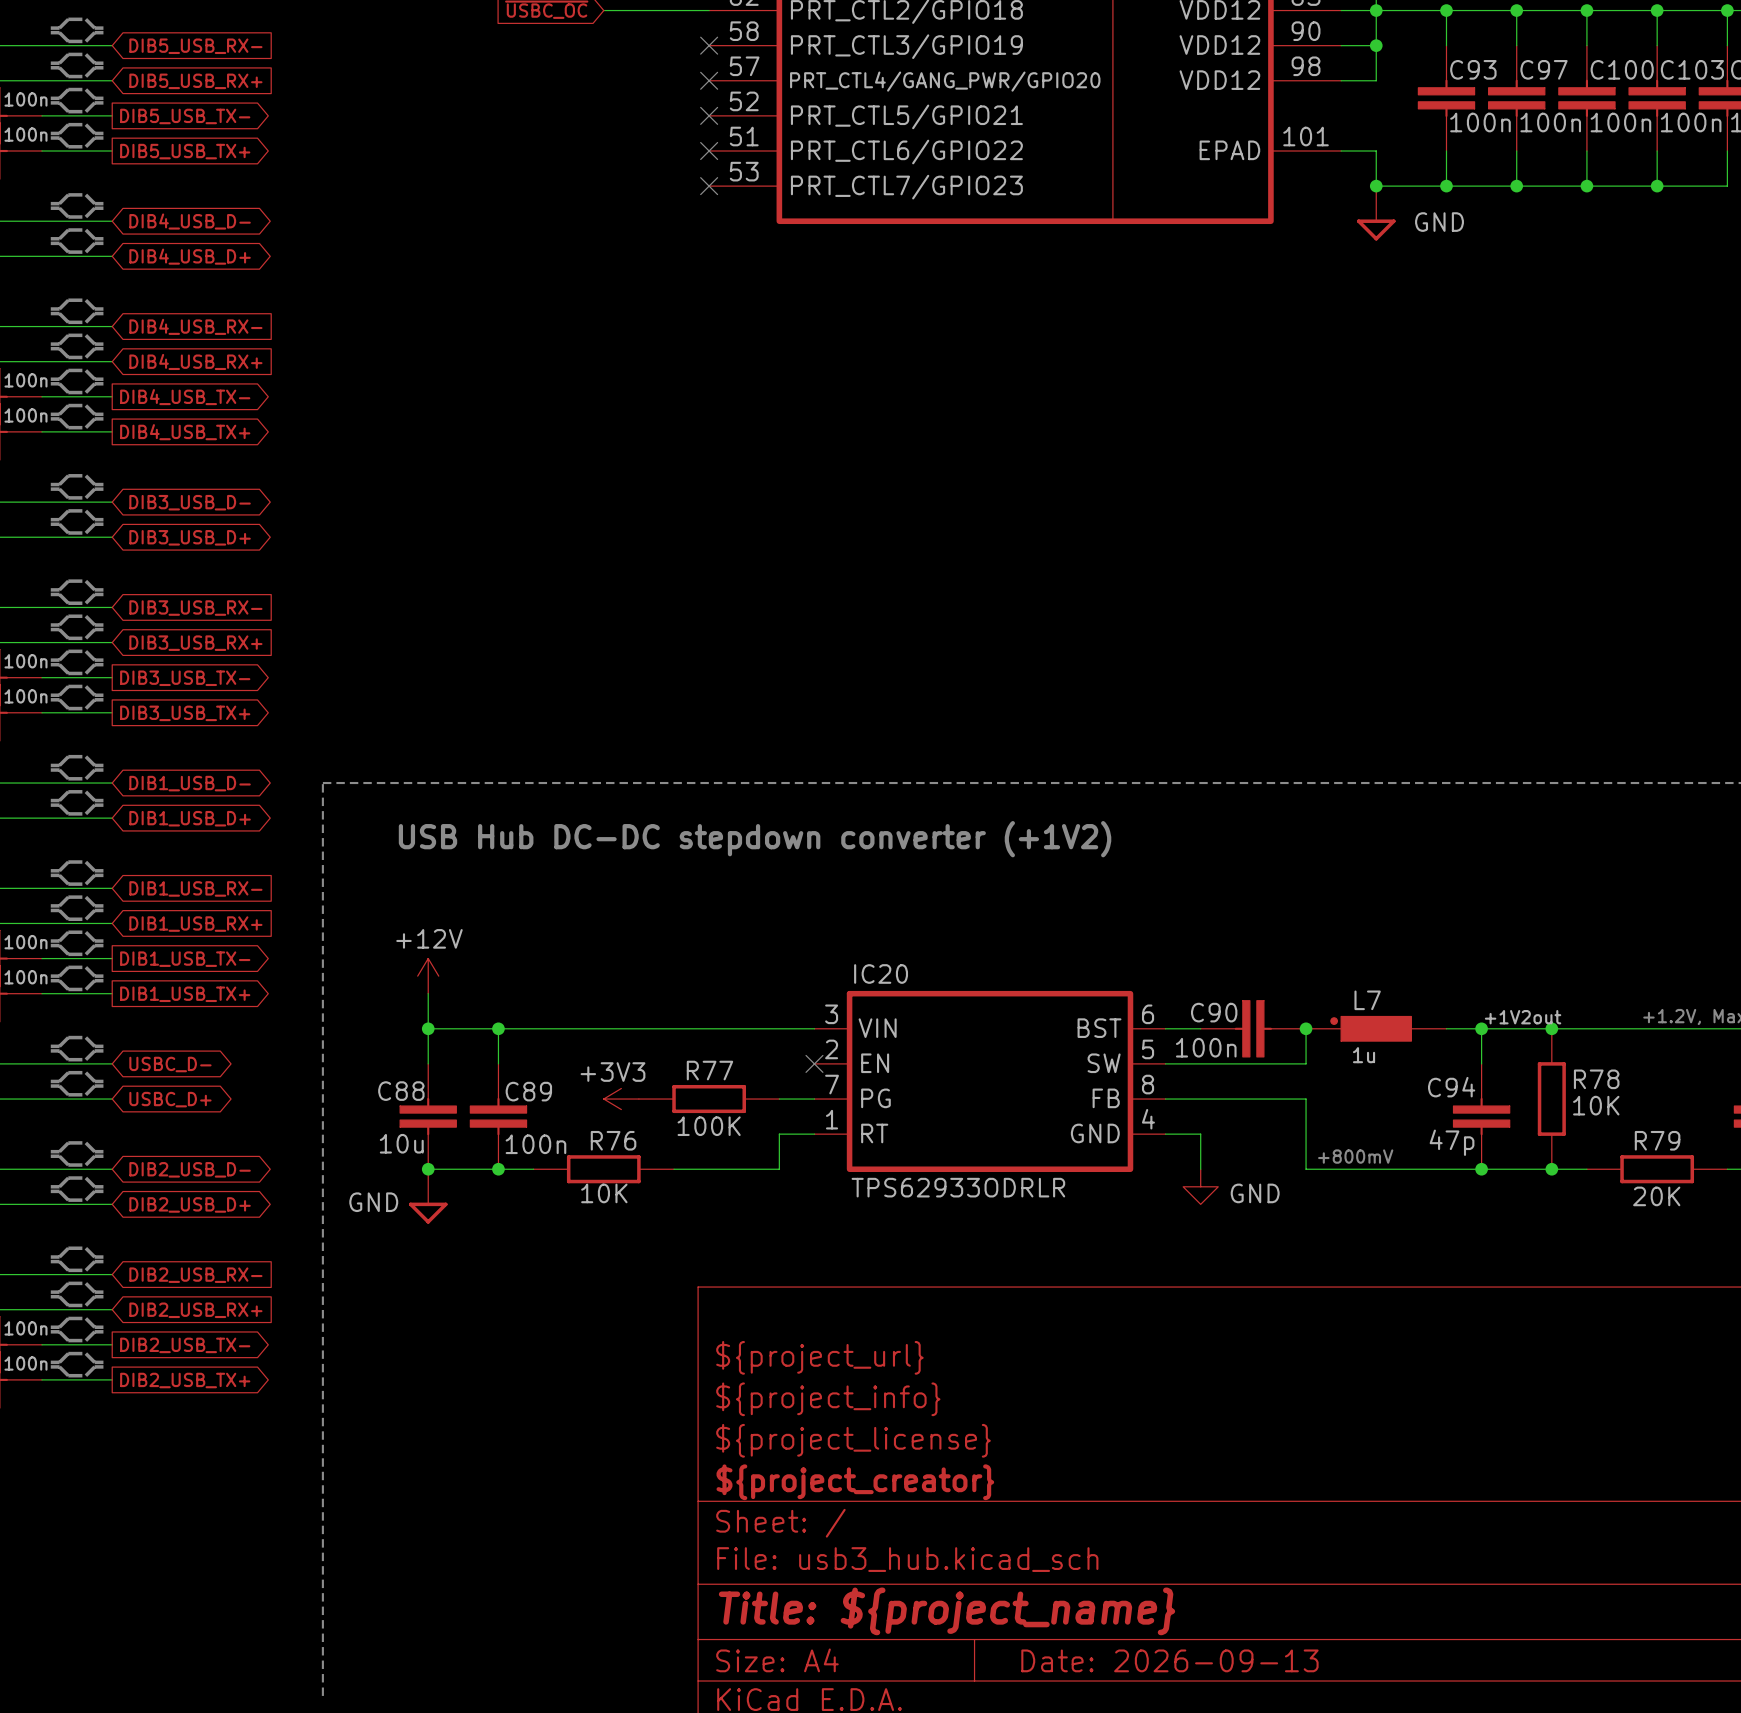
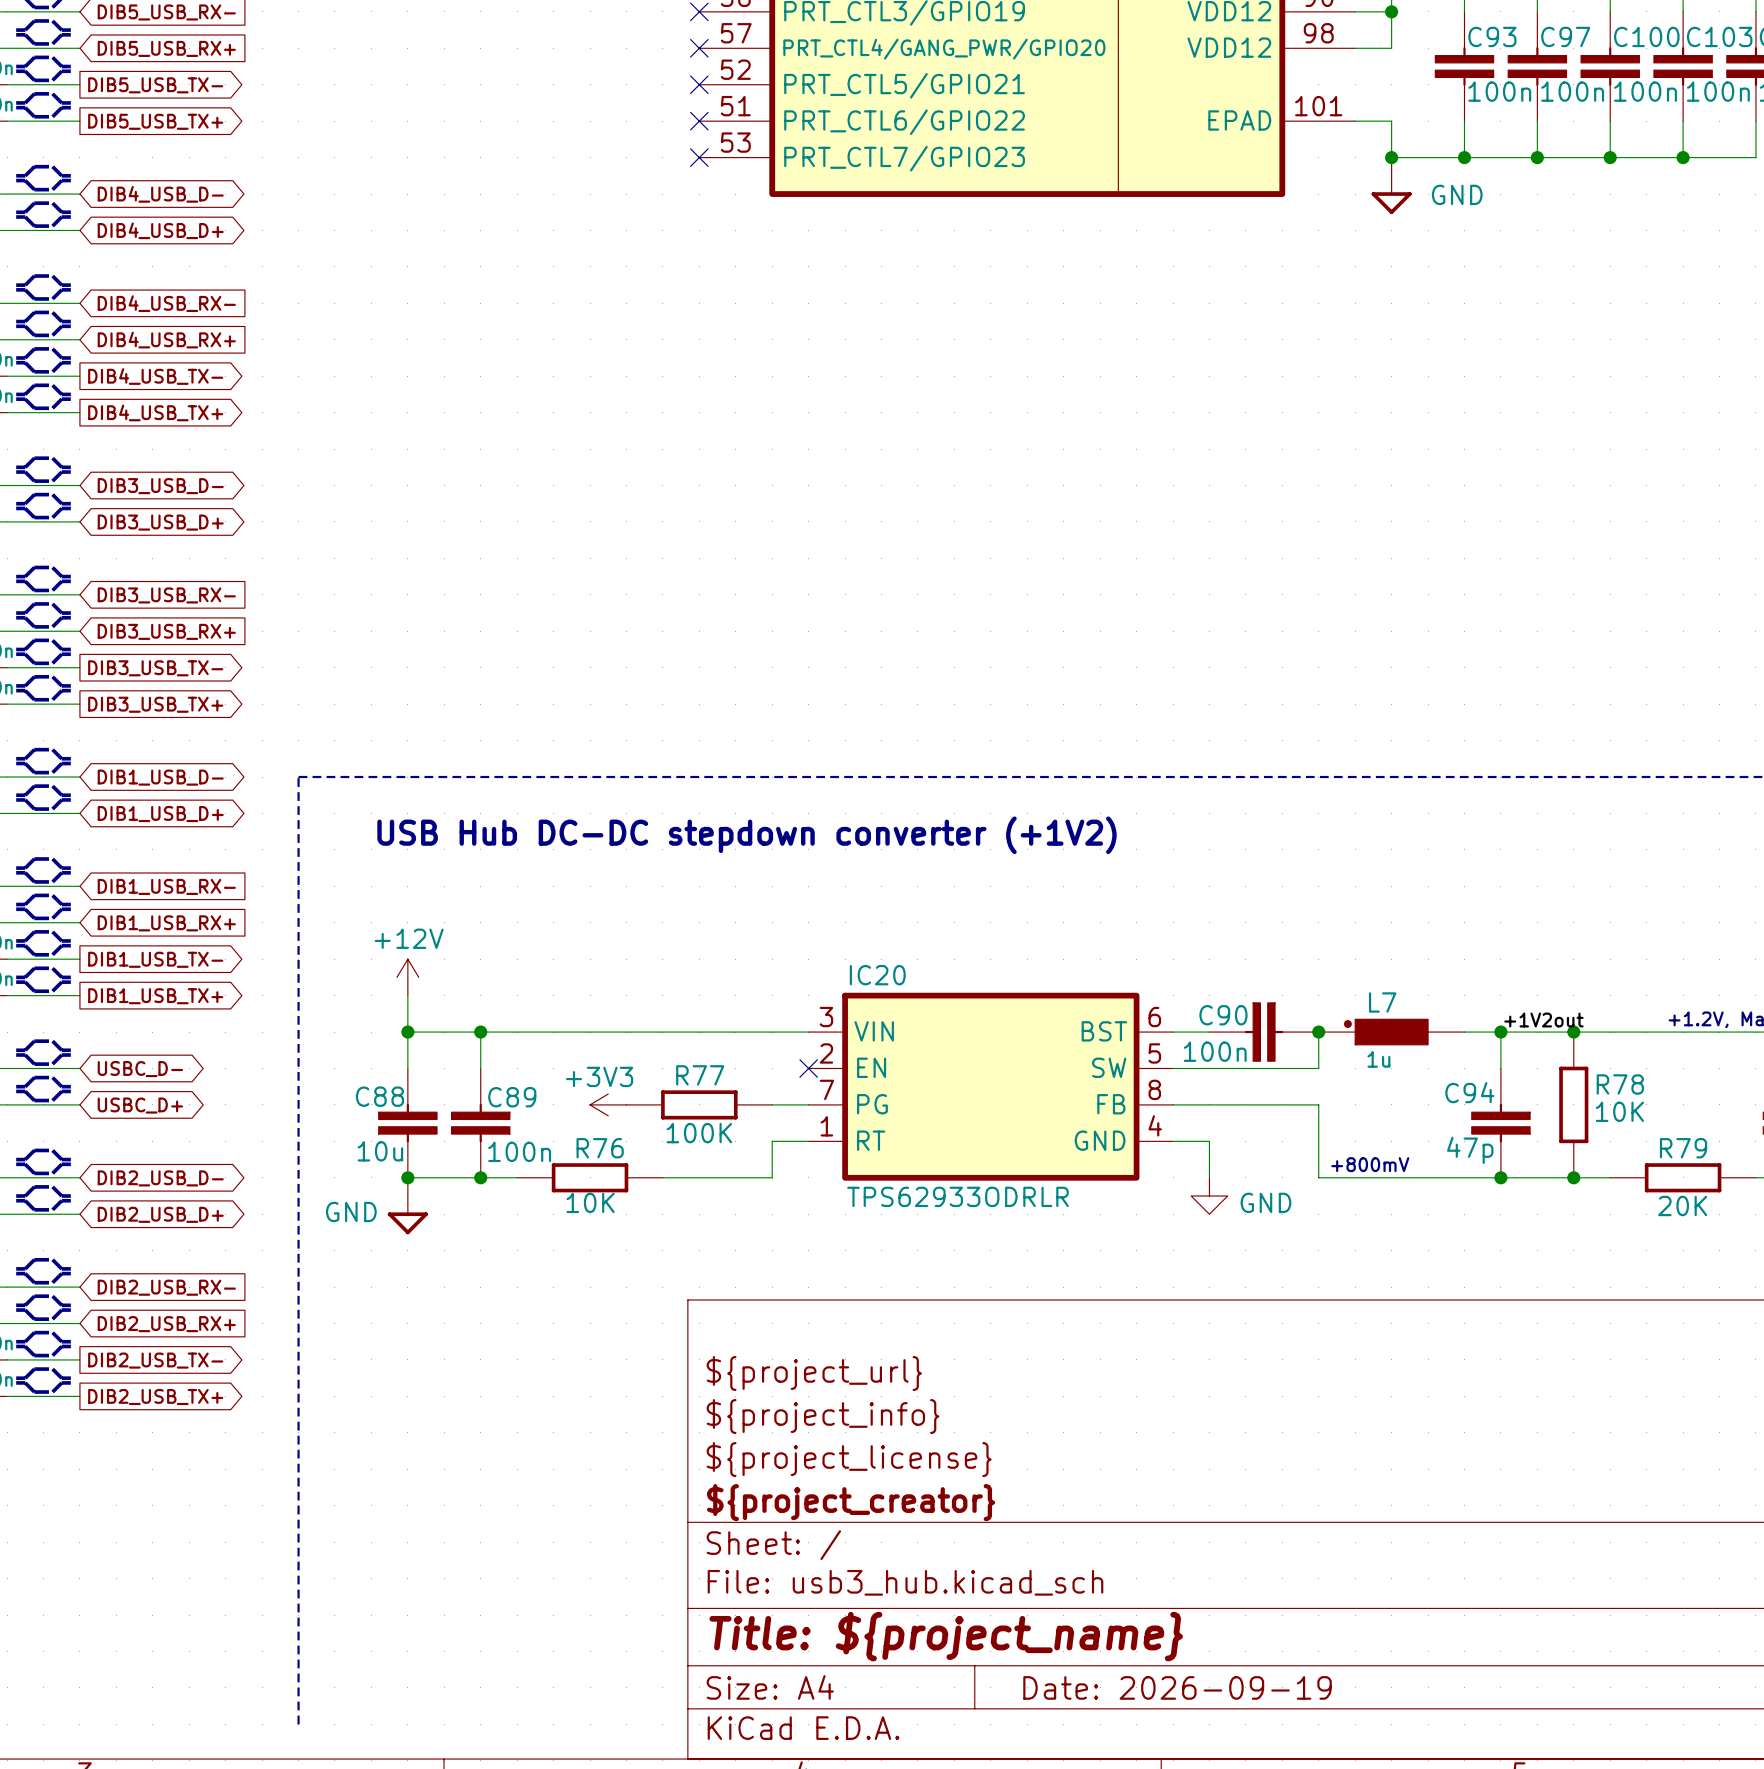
title block: Date: 2026-09-13 (1169, 1660) -> Date: 2026-09-19 (1177, 1687)

